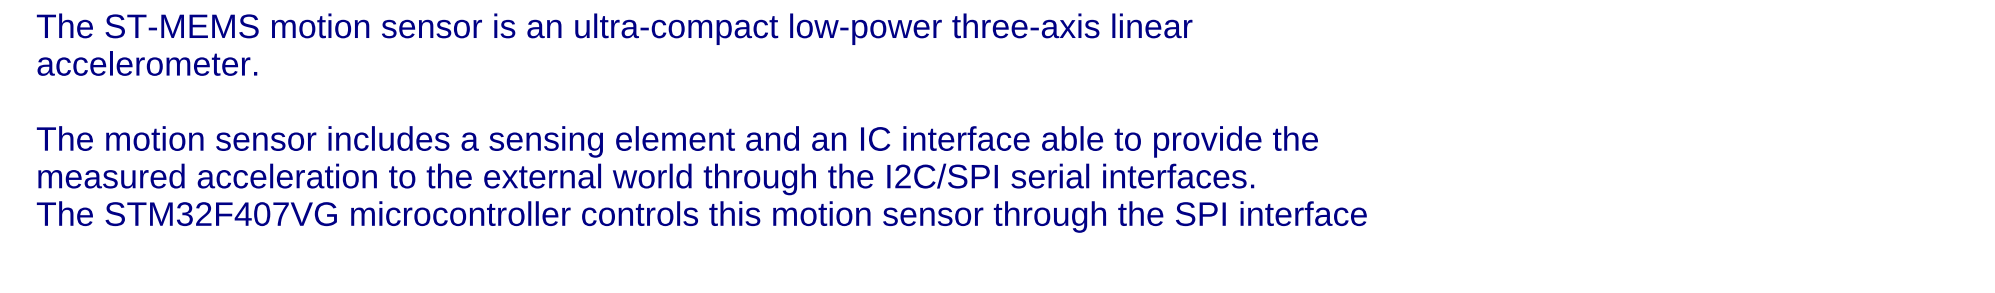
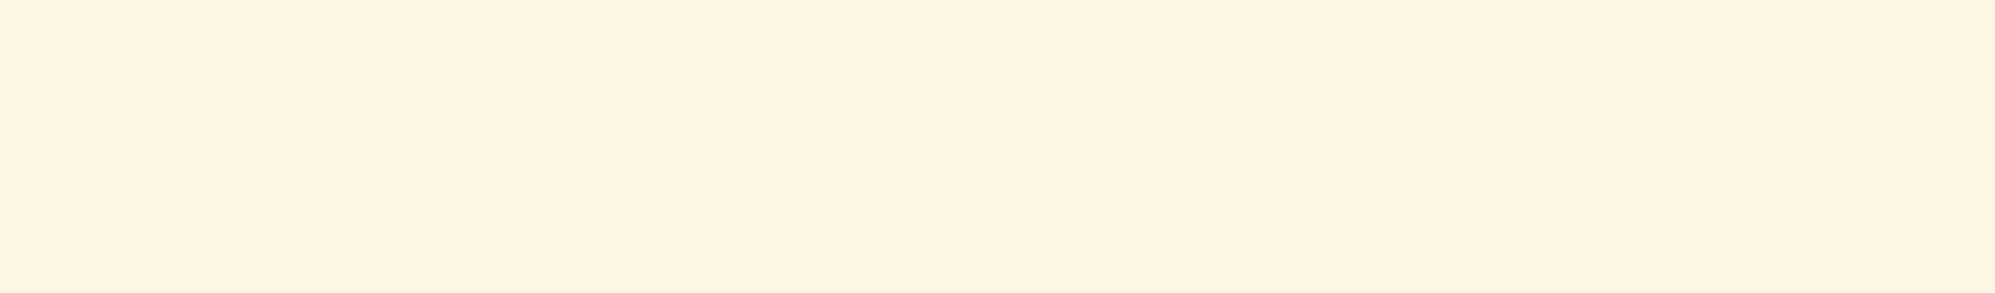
text: The ST-MEMS motion sensor is an ultra-compact low-power three-axis linear (614, 29) -> none
text: accelerometer. (147, 63) -> none
text: The motion sensor includes a sensing element and an IC interface able to provide the (677, 141) -> none
text: measured acceleration to the external world through the I2C/SPI serial interfaces. (646, 179) -> none
text: The STM32F407VG microcontroller controls this motion sensor through the SPI interface (701, 217) -> none

